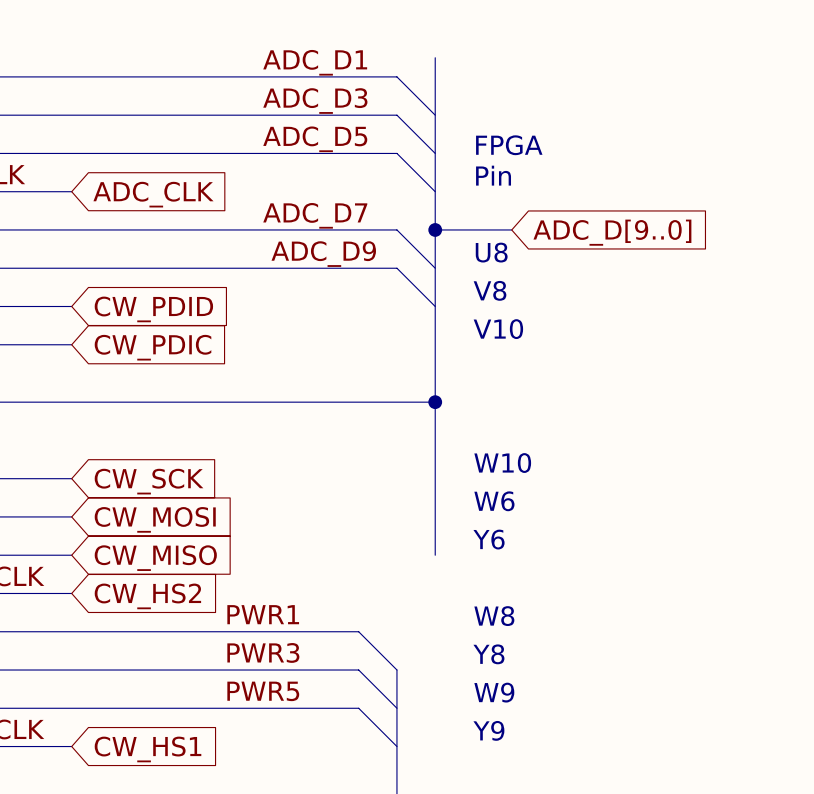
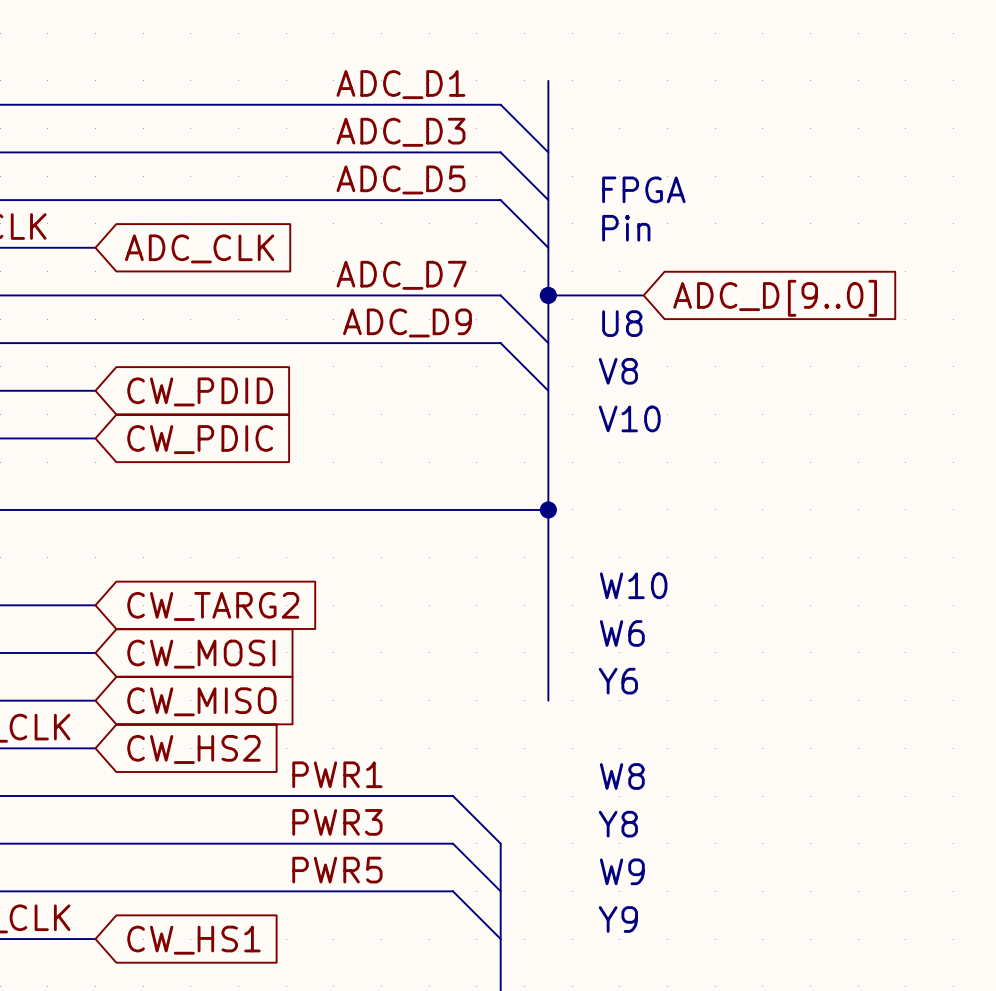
global label: CW_SCK (149, 481) -> CW_TARG2 (213, 606)

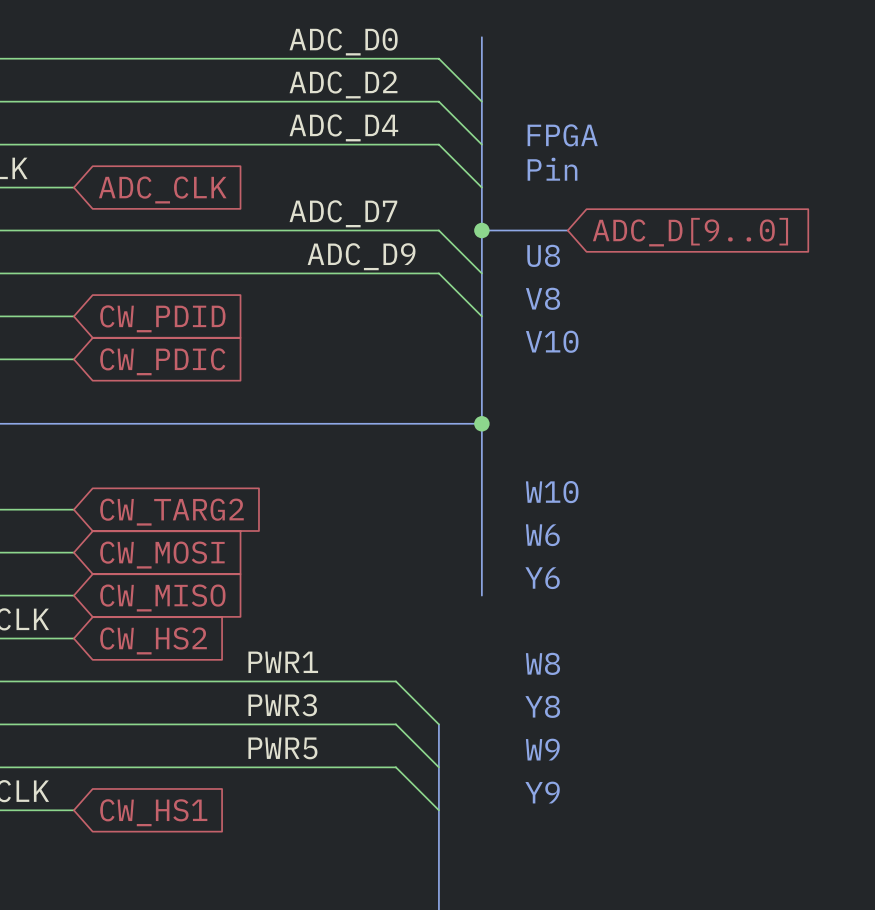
label: ADC_D1 (400, 84) -> ADC_D0 (343, 41)
label: ADC_D3 (400, 132) -> ADC_D2 (343, 84)
label: ADC_D5 (400, 179) -> ADC_D4 (343, 127)

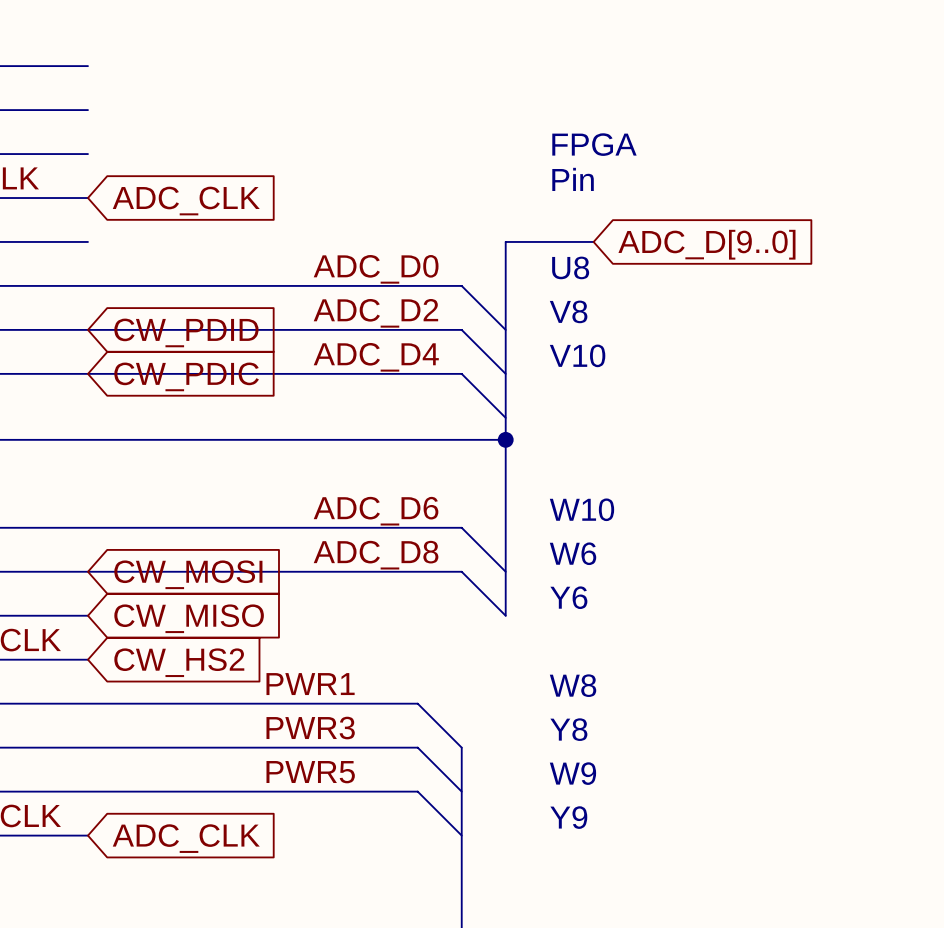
bus: (481, 37) (481, 230) -> none
label: ADC_D0 (343, 41) -> none
wire: (73, 58) (438, 58) (481, 101) -> none
label position: ADC_D2 (343, 84) -> ADC_D2 (375, 313)
wire: (73, 101) (438, 101) (481, 144) -> (87, 329) (461, 329) (505, 373)
label position: ADC_D4 (343, 127) -> ADC_D4 (376, 357)
wire: (73, 144) (438, 144) (481, 187) -> (87, 373) (461, 373) (505, 417)
label: ADC_D7 (343, 213) -> none
wire: (73, 230) (438, 230) (481, 273) -> (87, 527) (461, 527) (505, 571)
junction: (481, 230) -> none
label: ADC_D9 (361, 256) -> ADC_D0 (376, 269)
label: none -> ADC_D6 (376, 511)
global label: CW_TARG2 (171, 512) -> none
label: none -> ADC_D8 (376, 555)
wire: none -> (87, 571) (461, 571) (505, 615)
global label: CW_HS1 (153, 812) -> ADC_CLK (186, 838)

